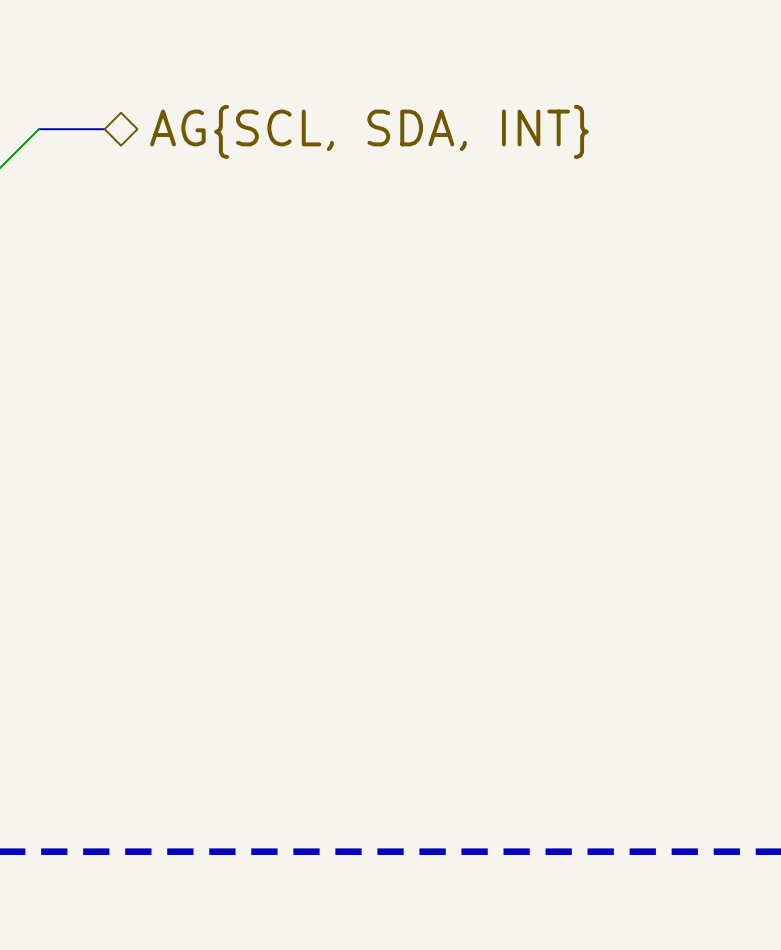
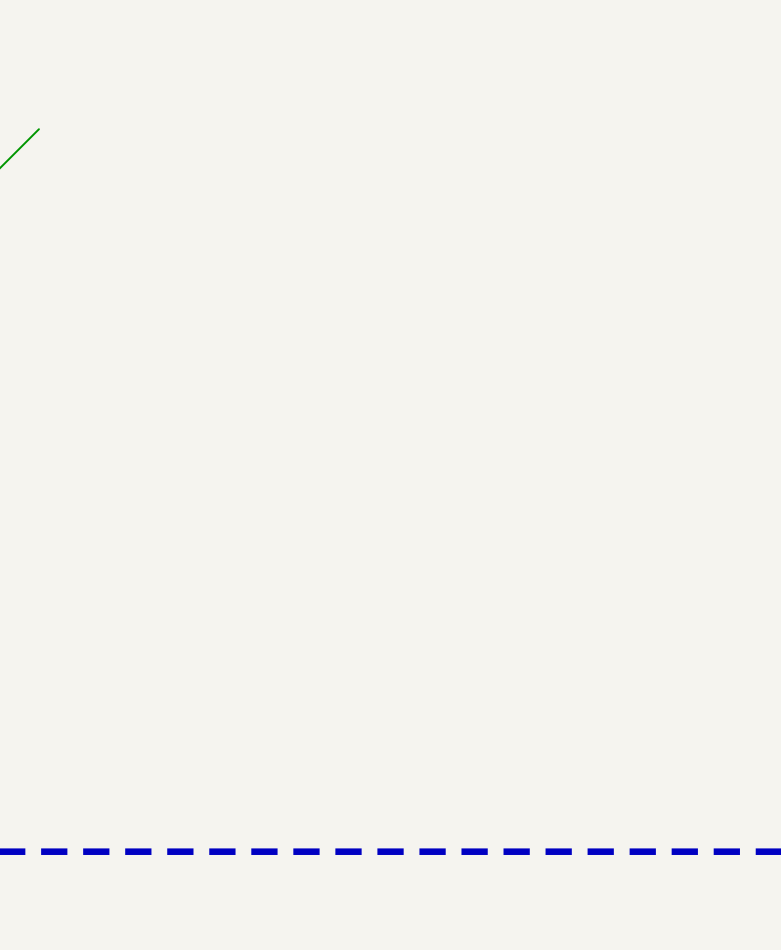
bus: (38, 129) (104, 129) -> none
hierarchical label: AG{SCL, SDA, INT} (369, 131) -> none

